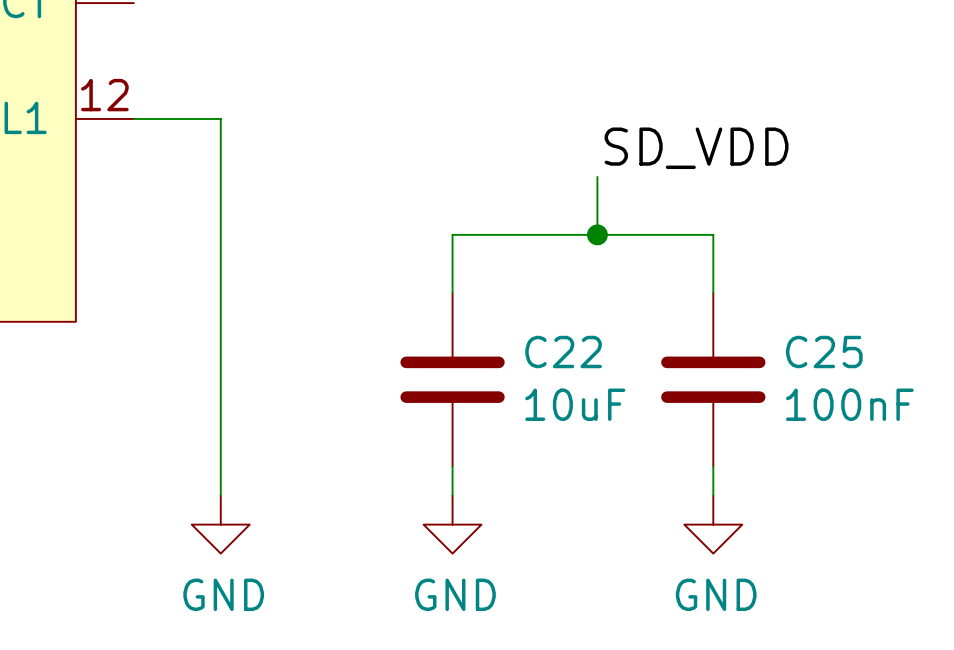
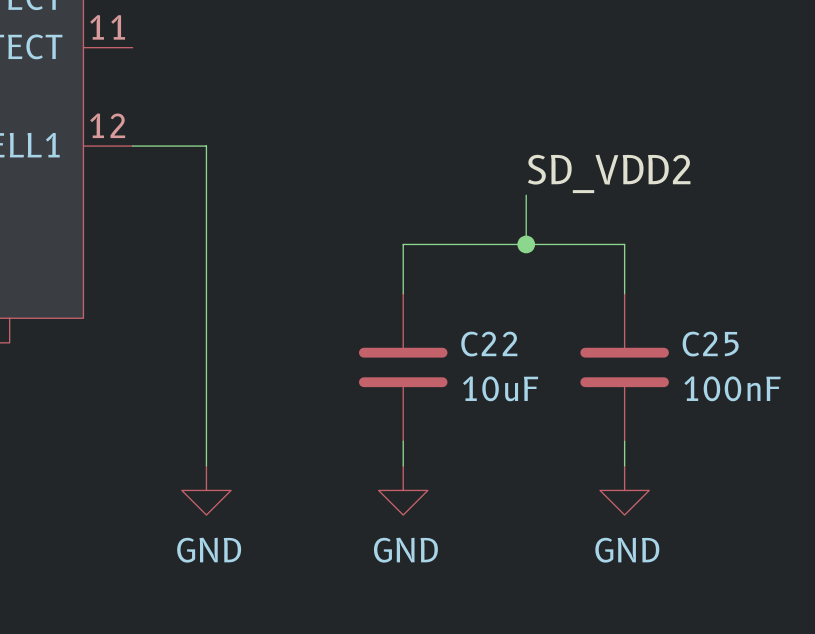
label: SD_VDD (696, 148) -> SD_VDD2 (609, 173)

